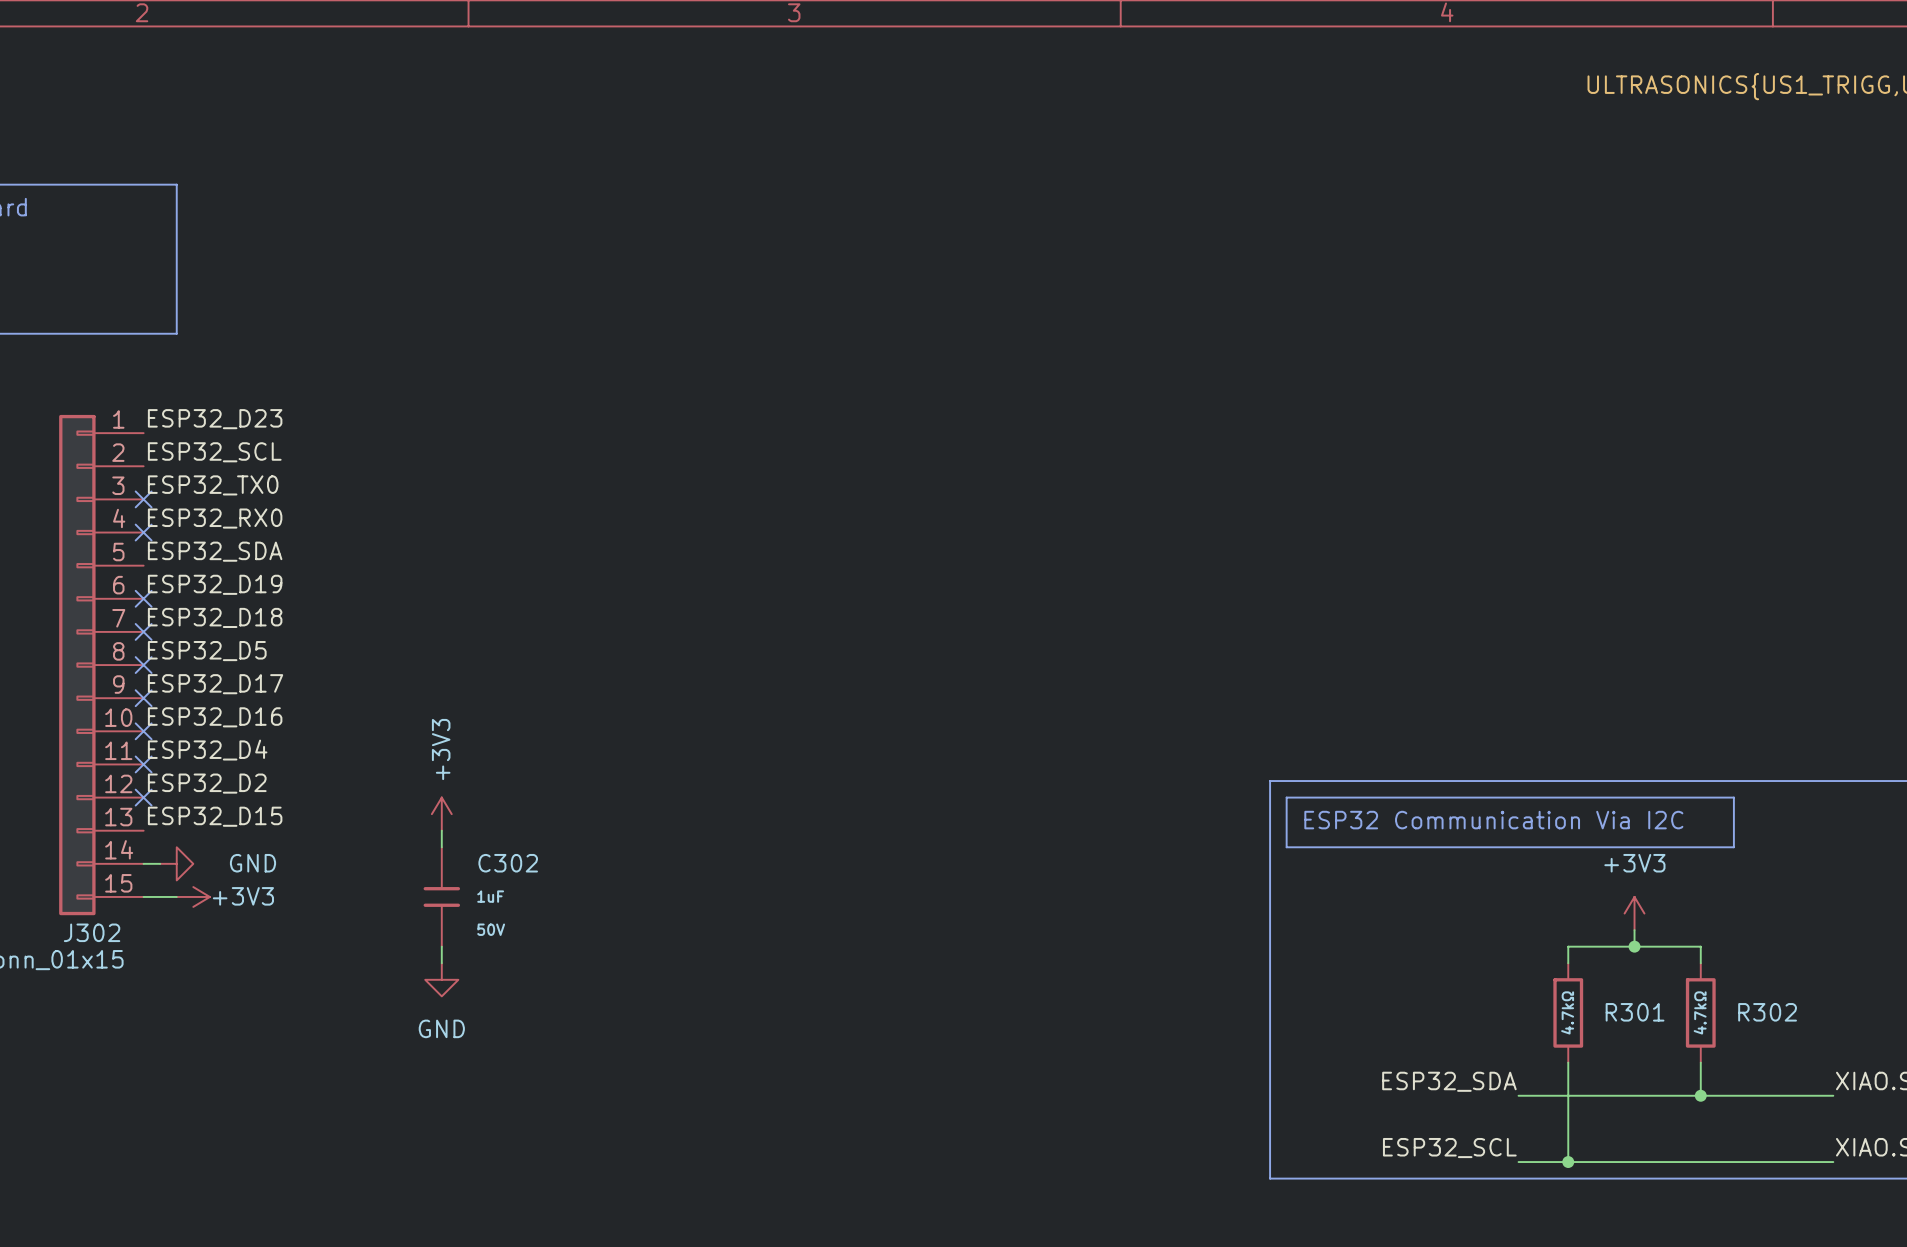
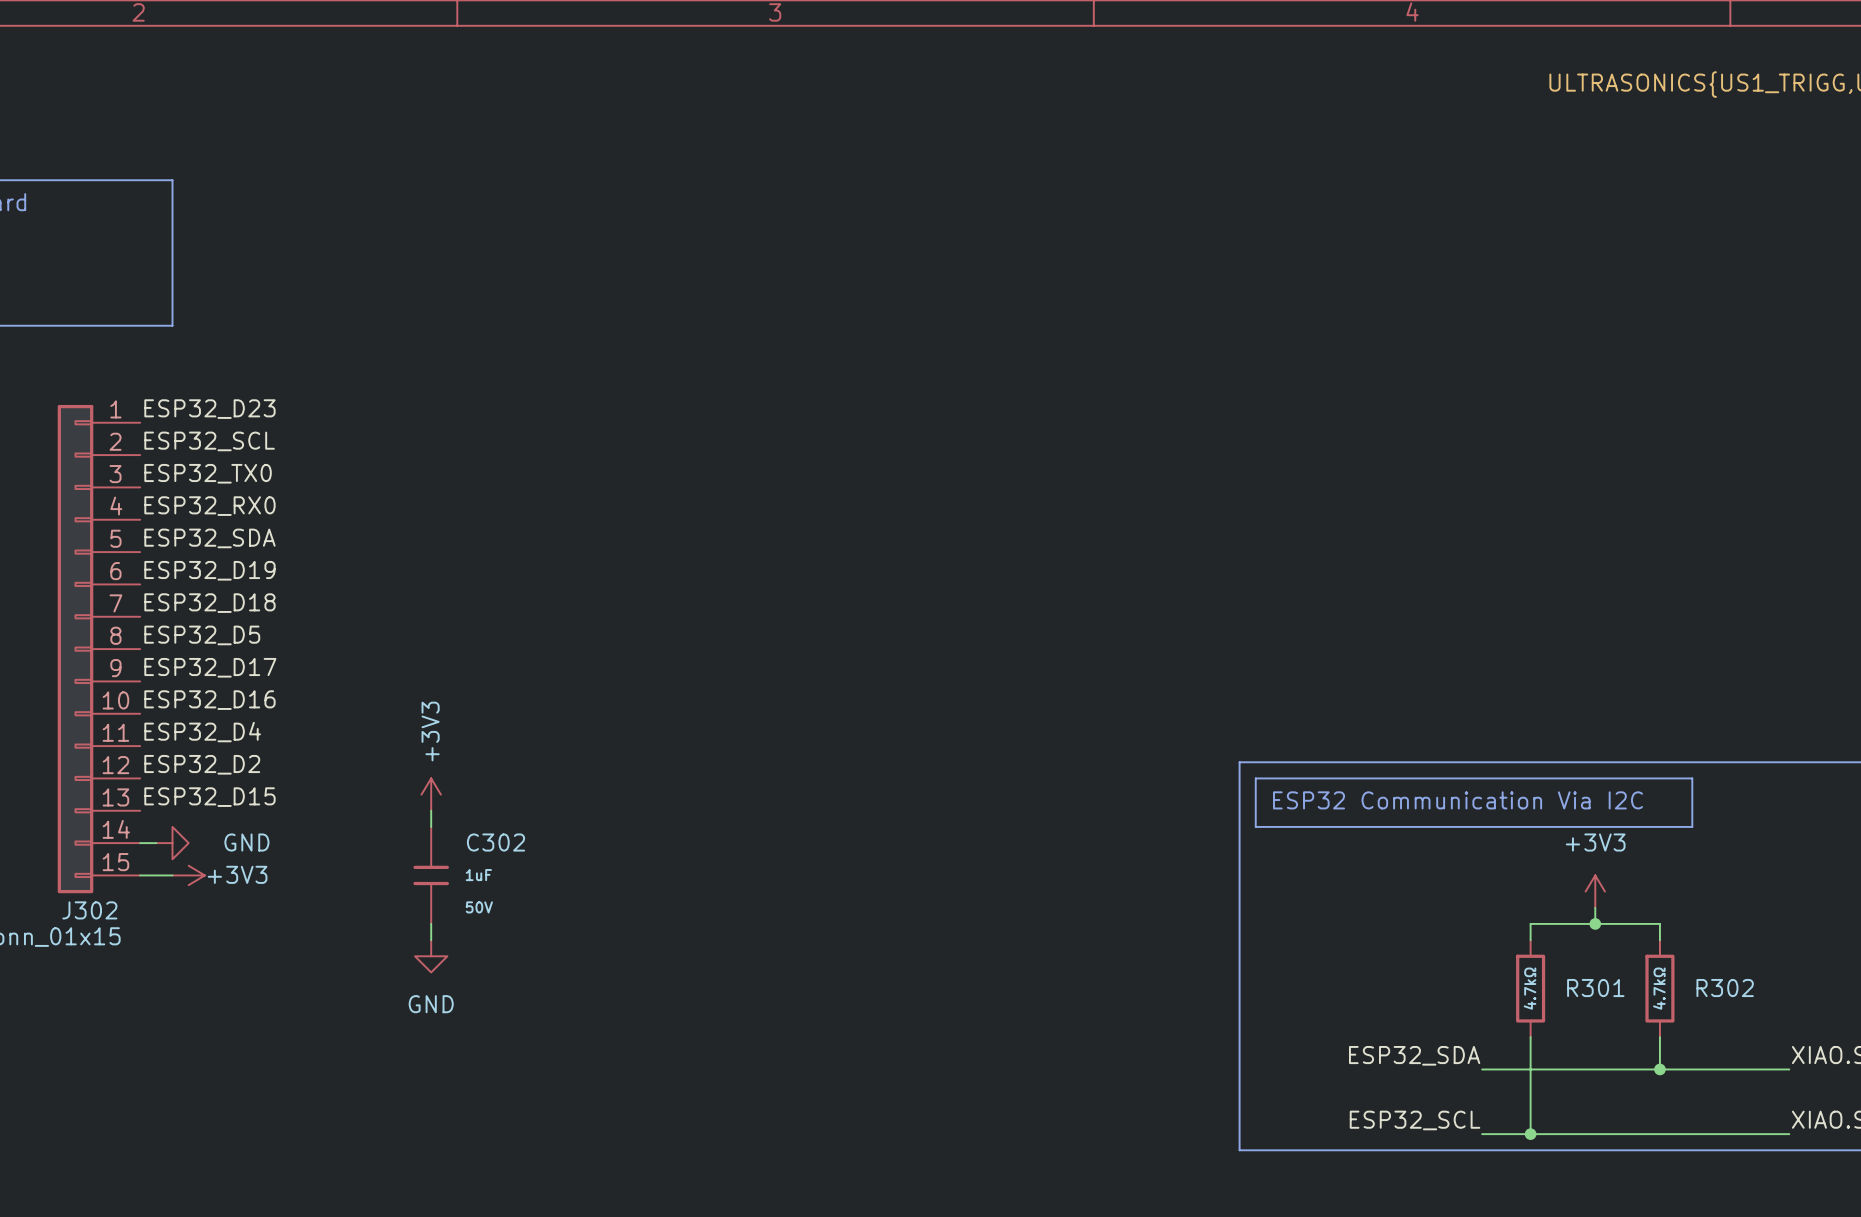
no-connect mark: (143, 499) -> none
no-connect mark: (143, 532) -> none
no-connect mark: (143, 598) -> none
no-connect mark: (143, 631) -> none
no-connect mark: (143, 665) -> none
no-connect mark: (143, 698) -> none
no-connect mark: (143, 731) -> none
no-connect mark: (143, 764) -> none
no-connect mark: (143, 797) -> none

